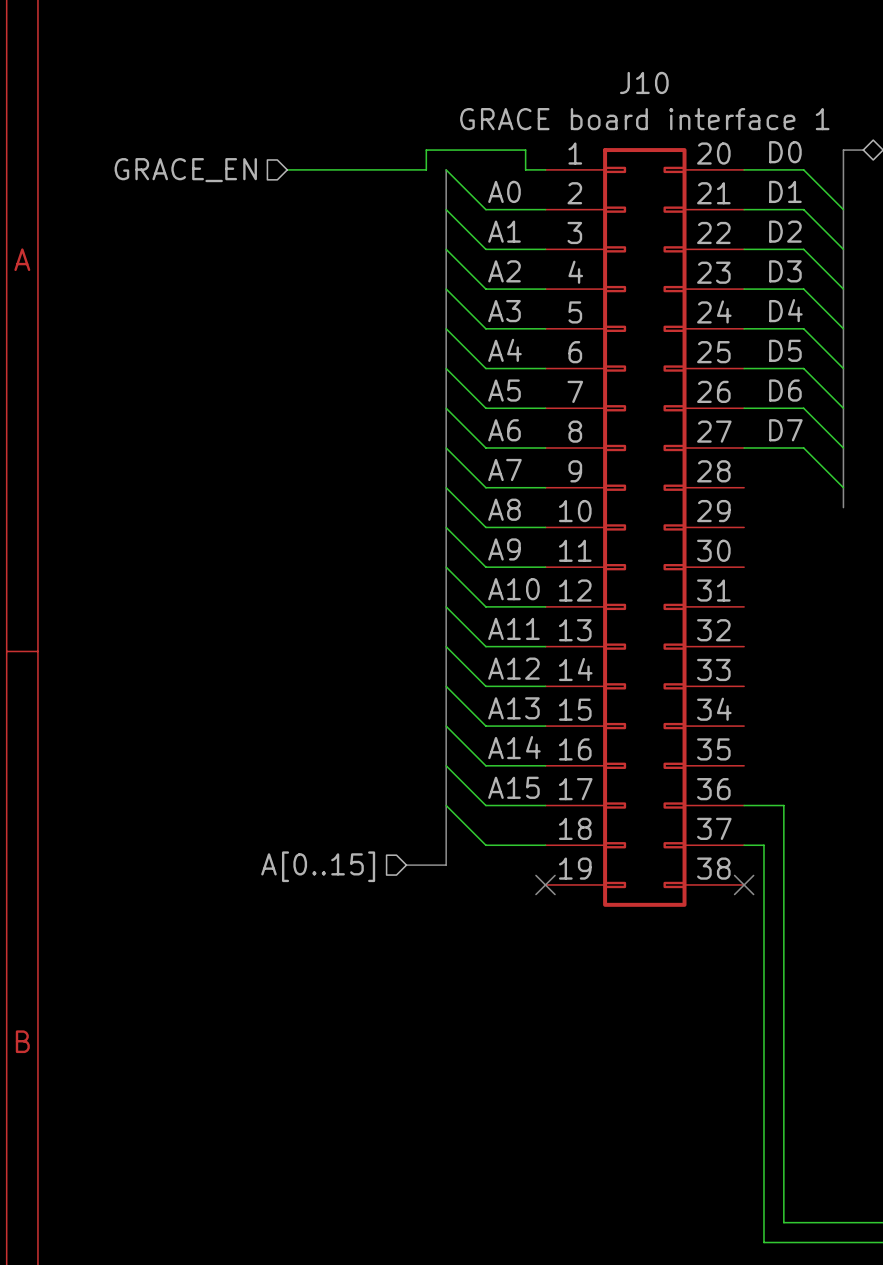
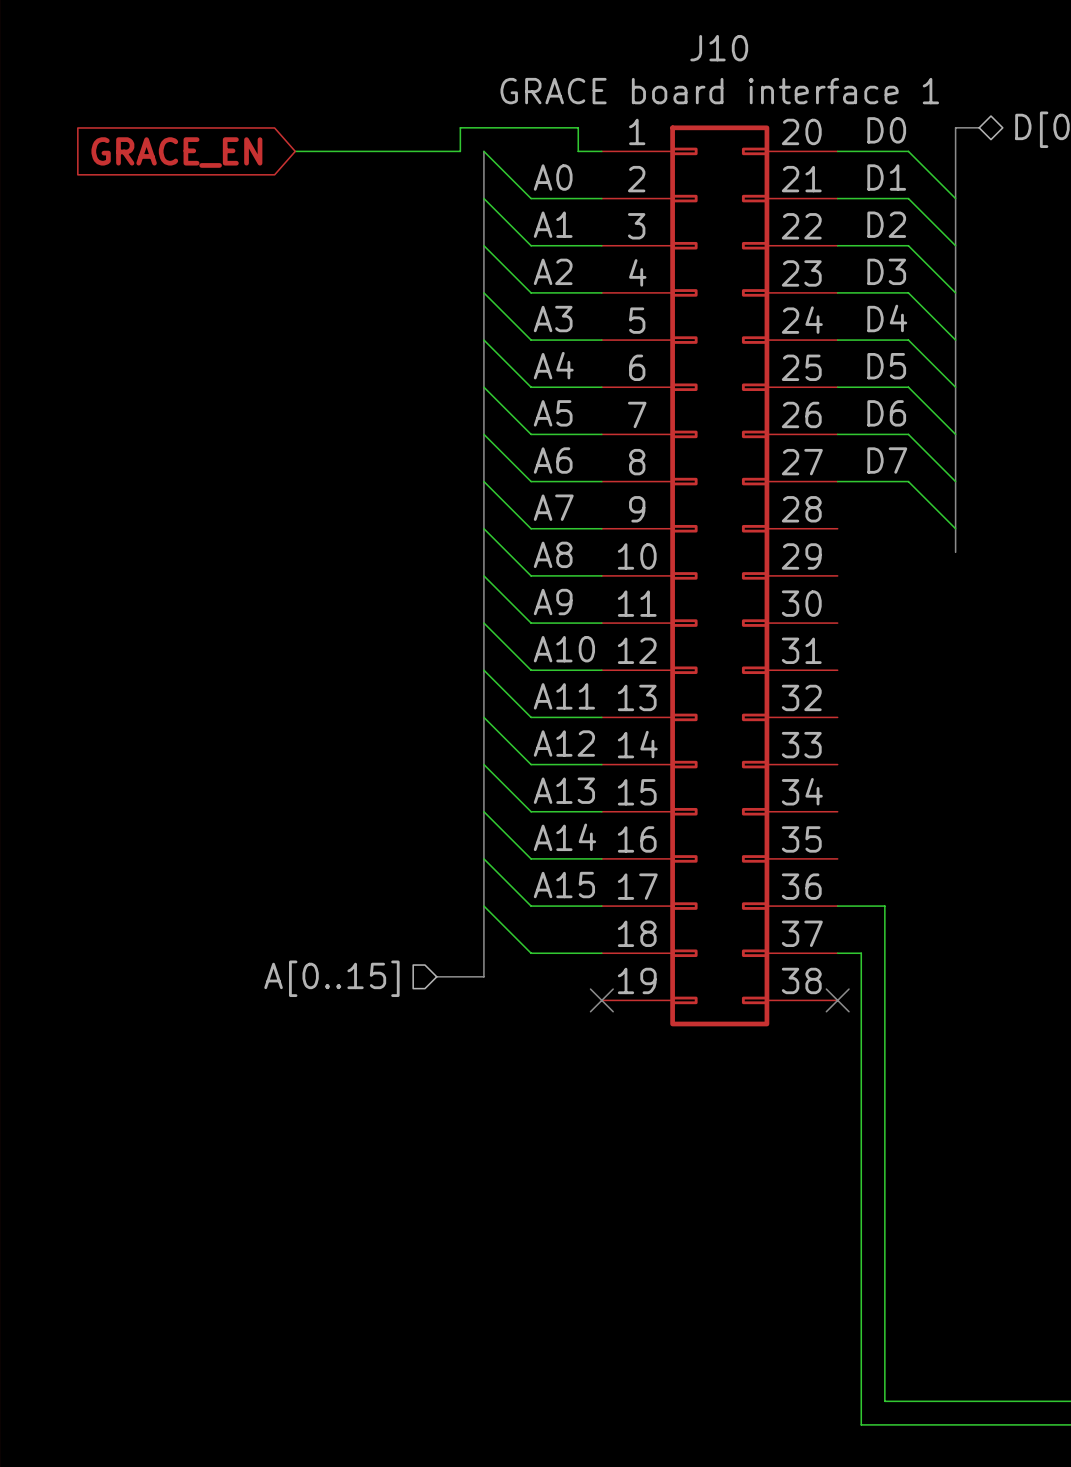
hierarchical label: GRACE_EN (185, 170) -> none
global label: none -> GRACE_EN (176, 152)

